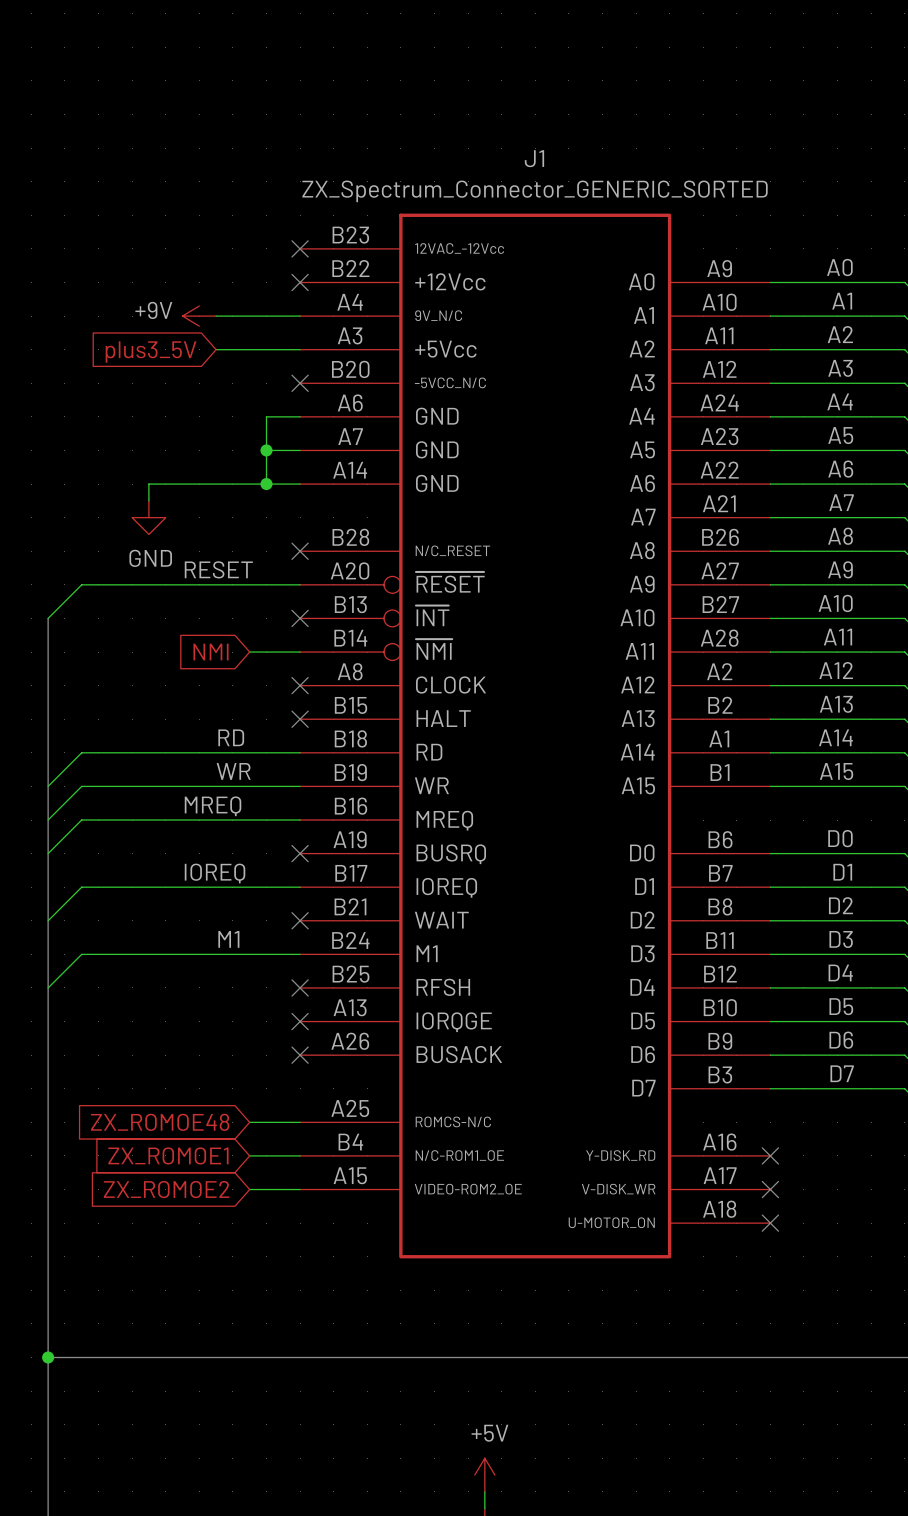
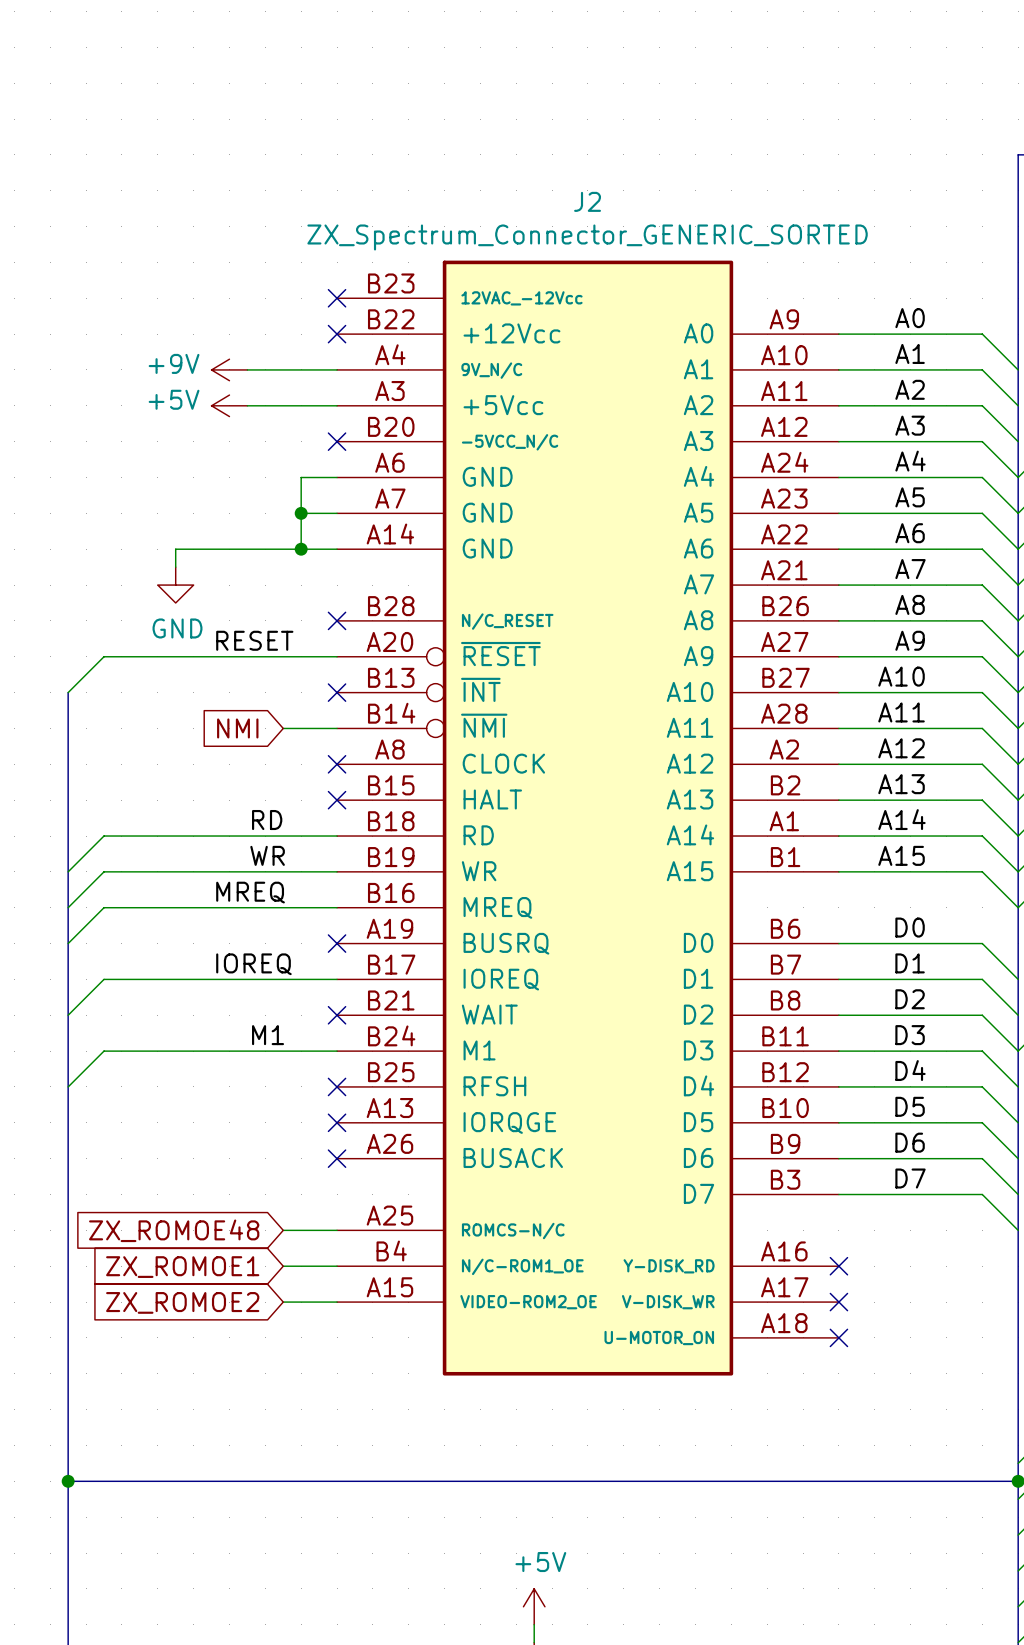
J1 name: J1 (534, 158) -> J2 (587, 201)
power symbol: none -> +5V (229, 405)
global label: plus3_5V (151, 352) -> none

